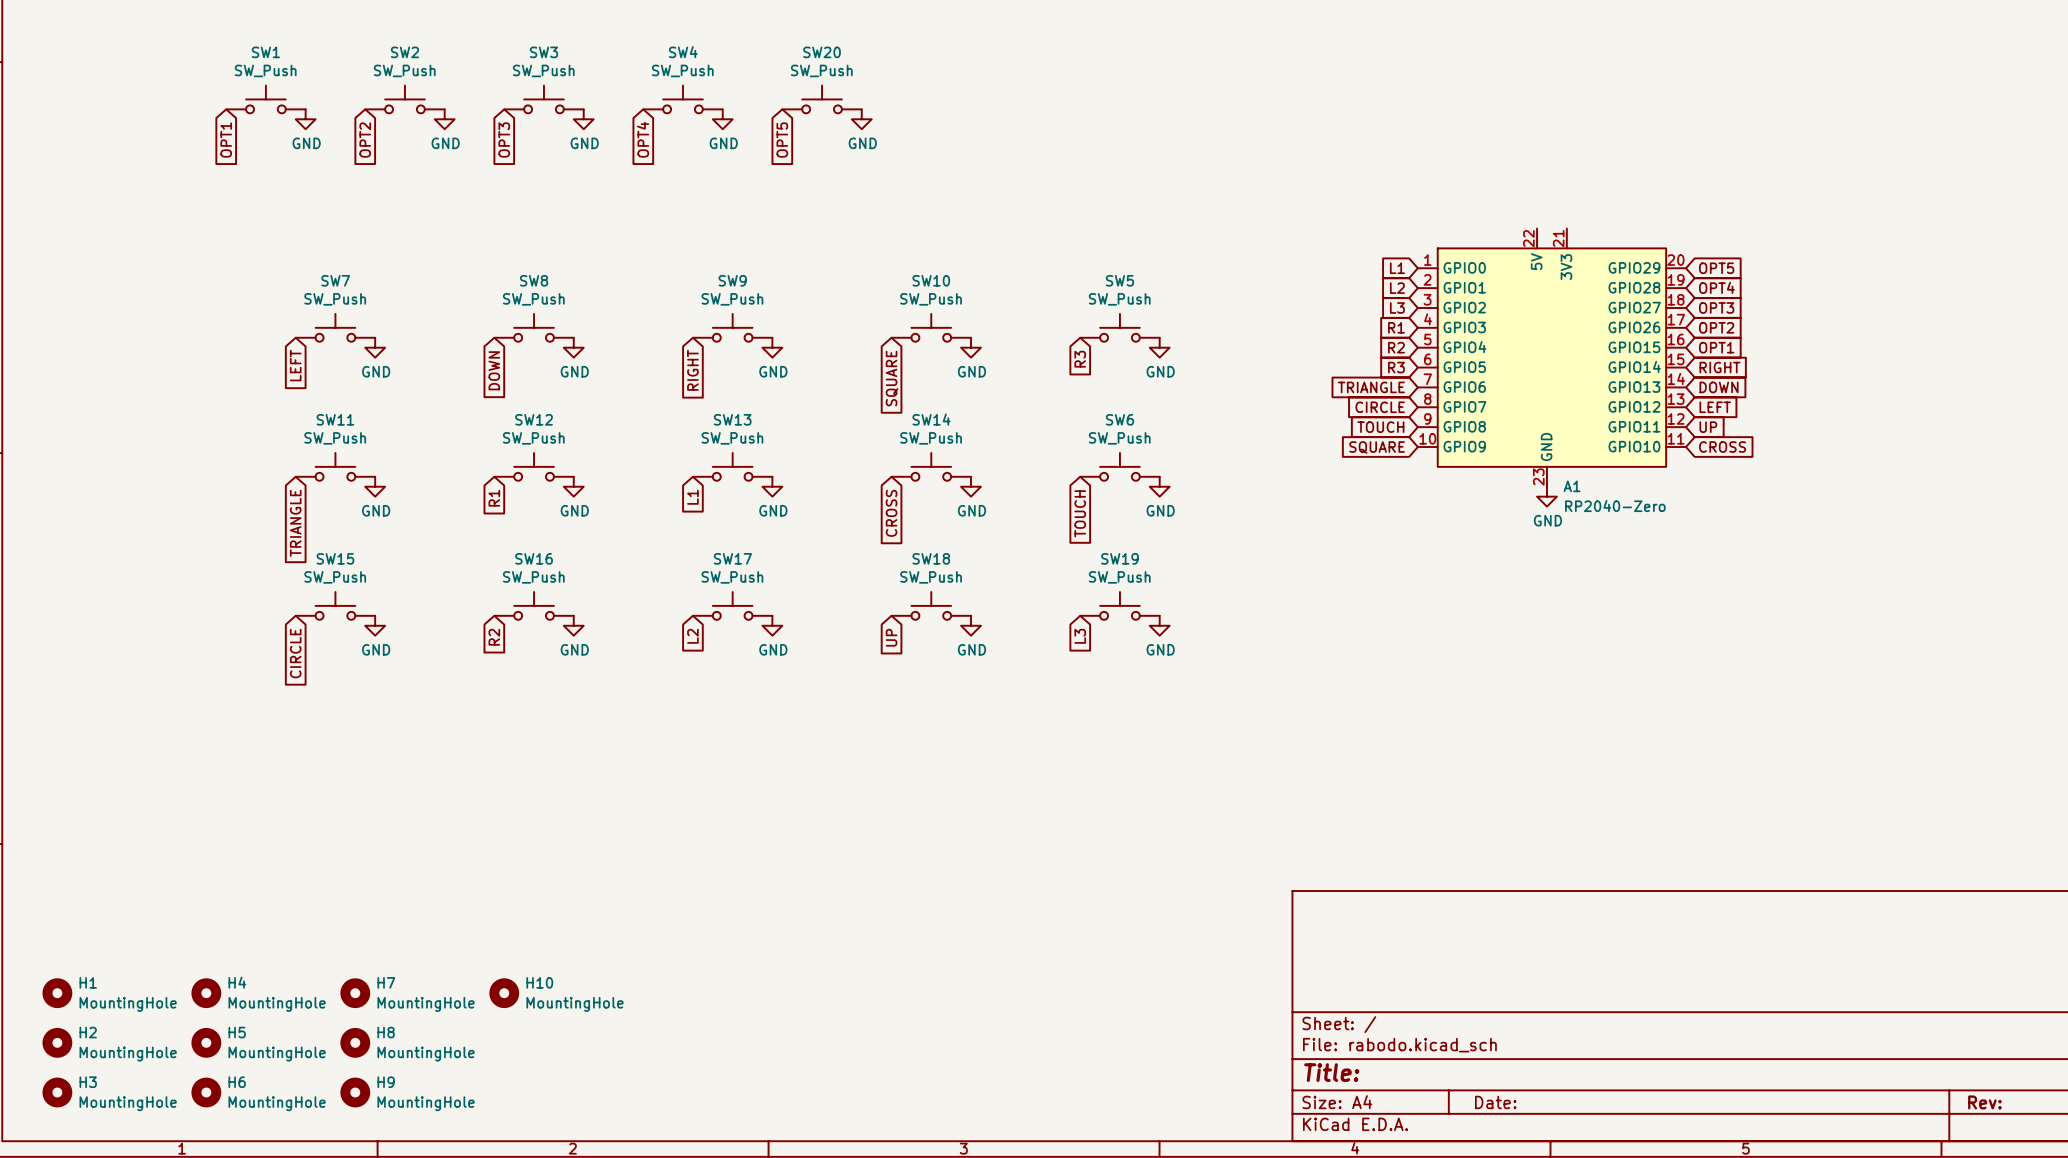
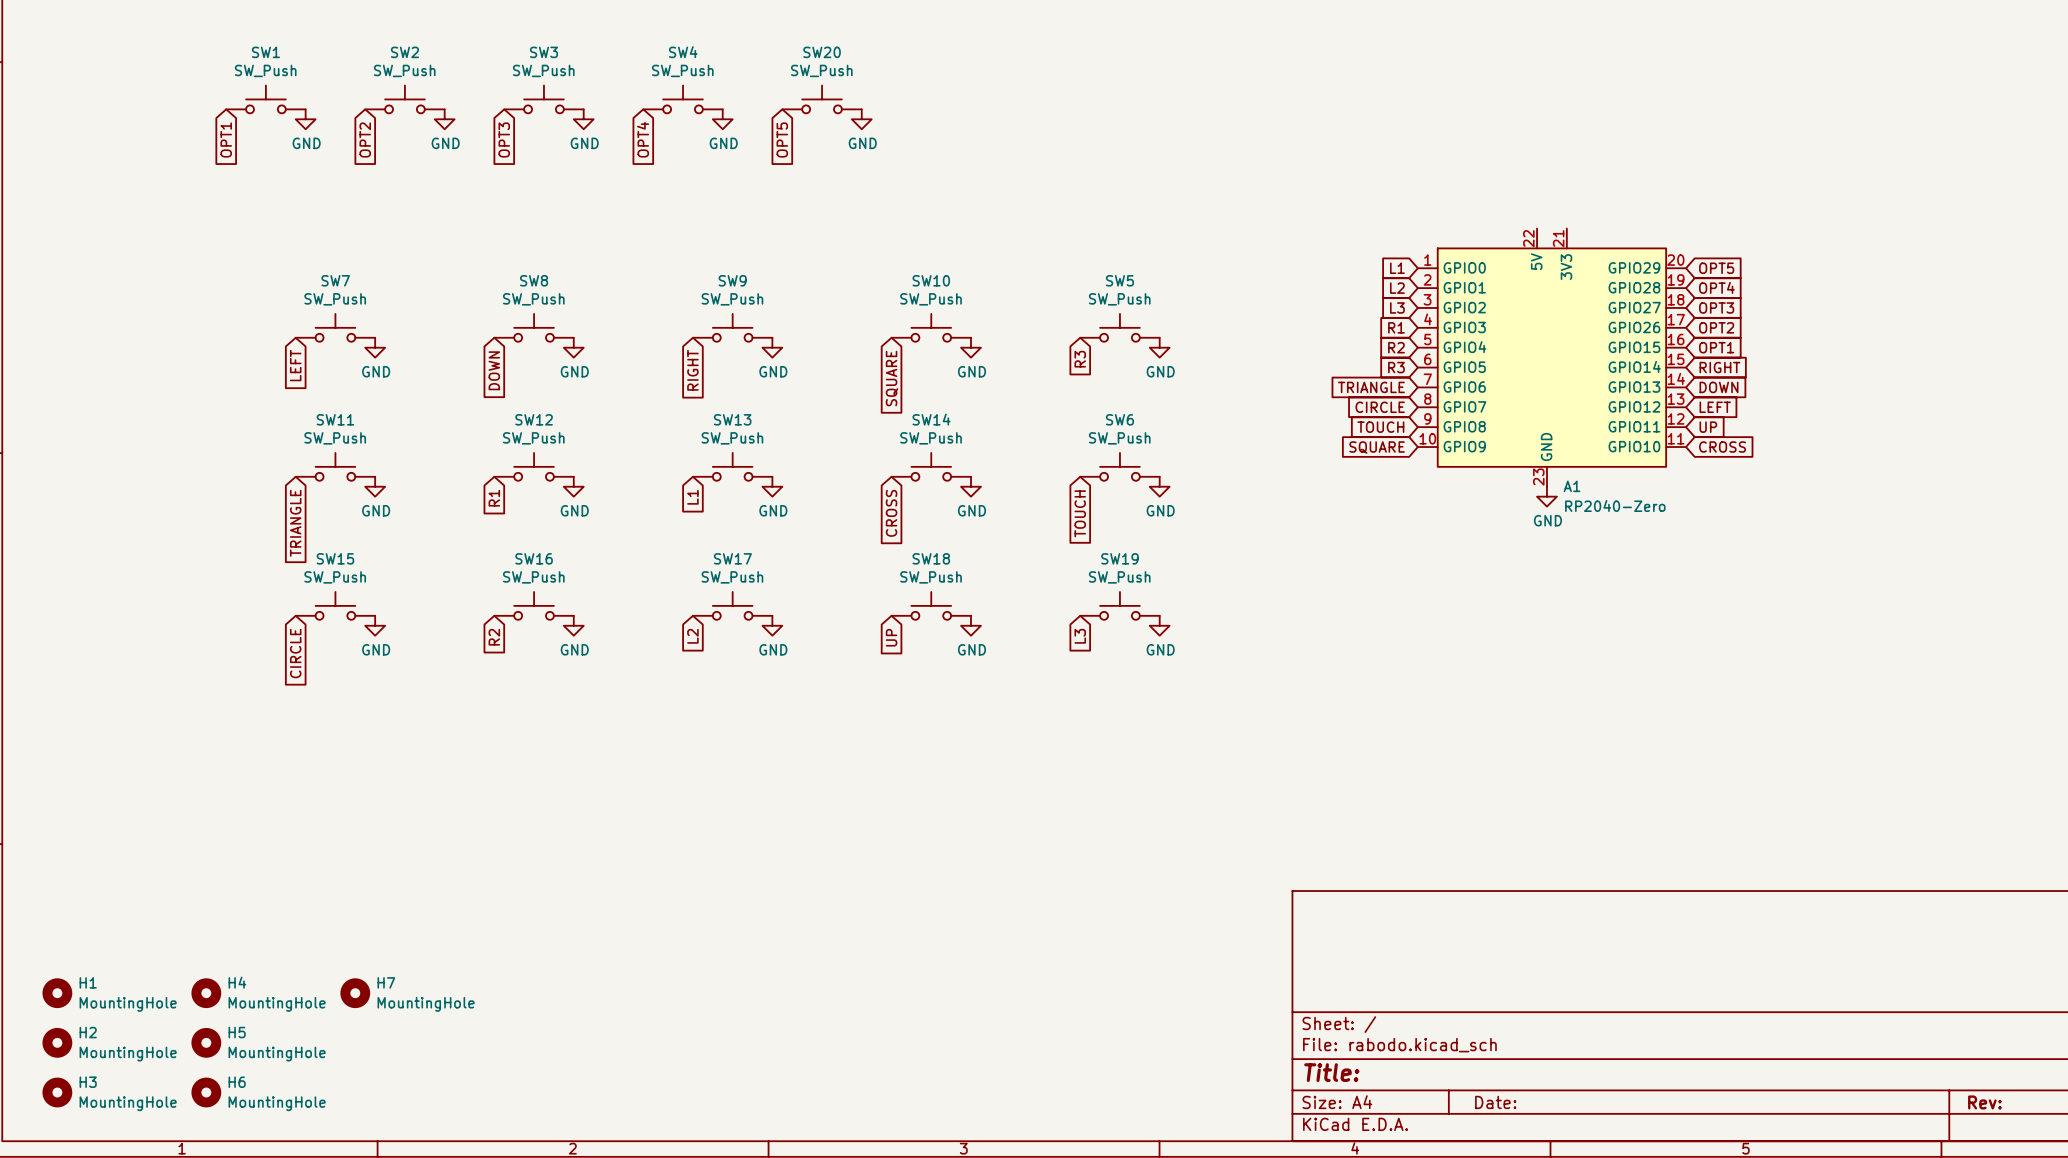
H10: MountingHole (504, 993) -> none
H8: MountingHole (355, 1042) -> none
H9: MountingHole (355, 1092) -> none

